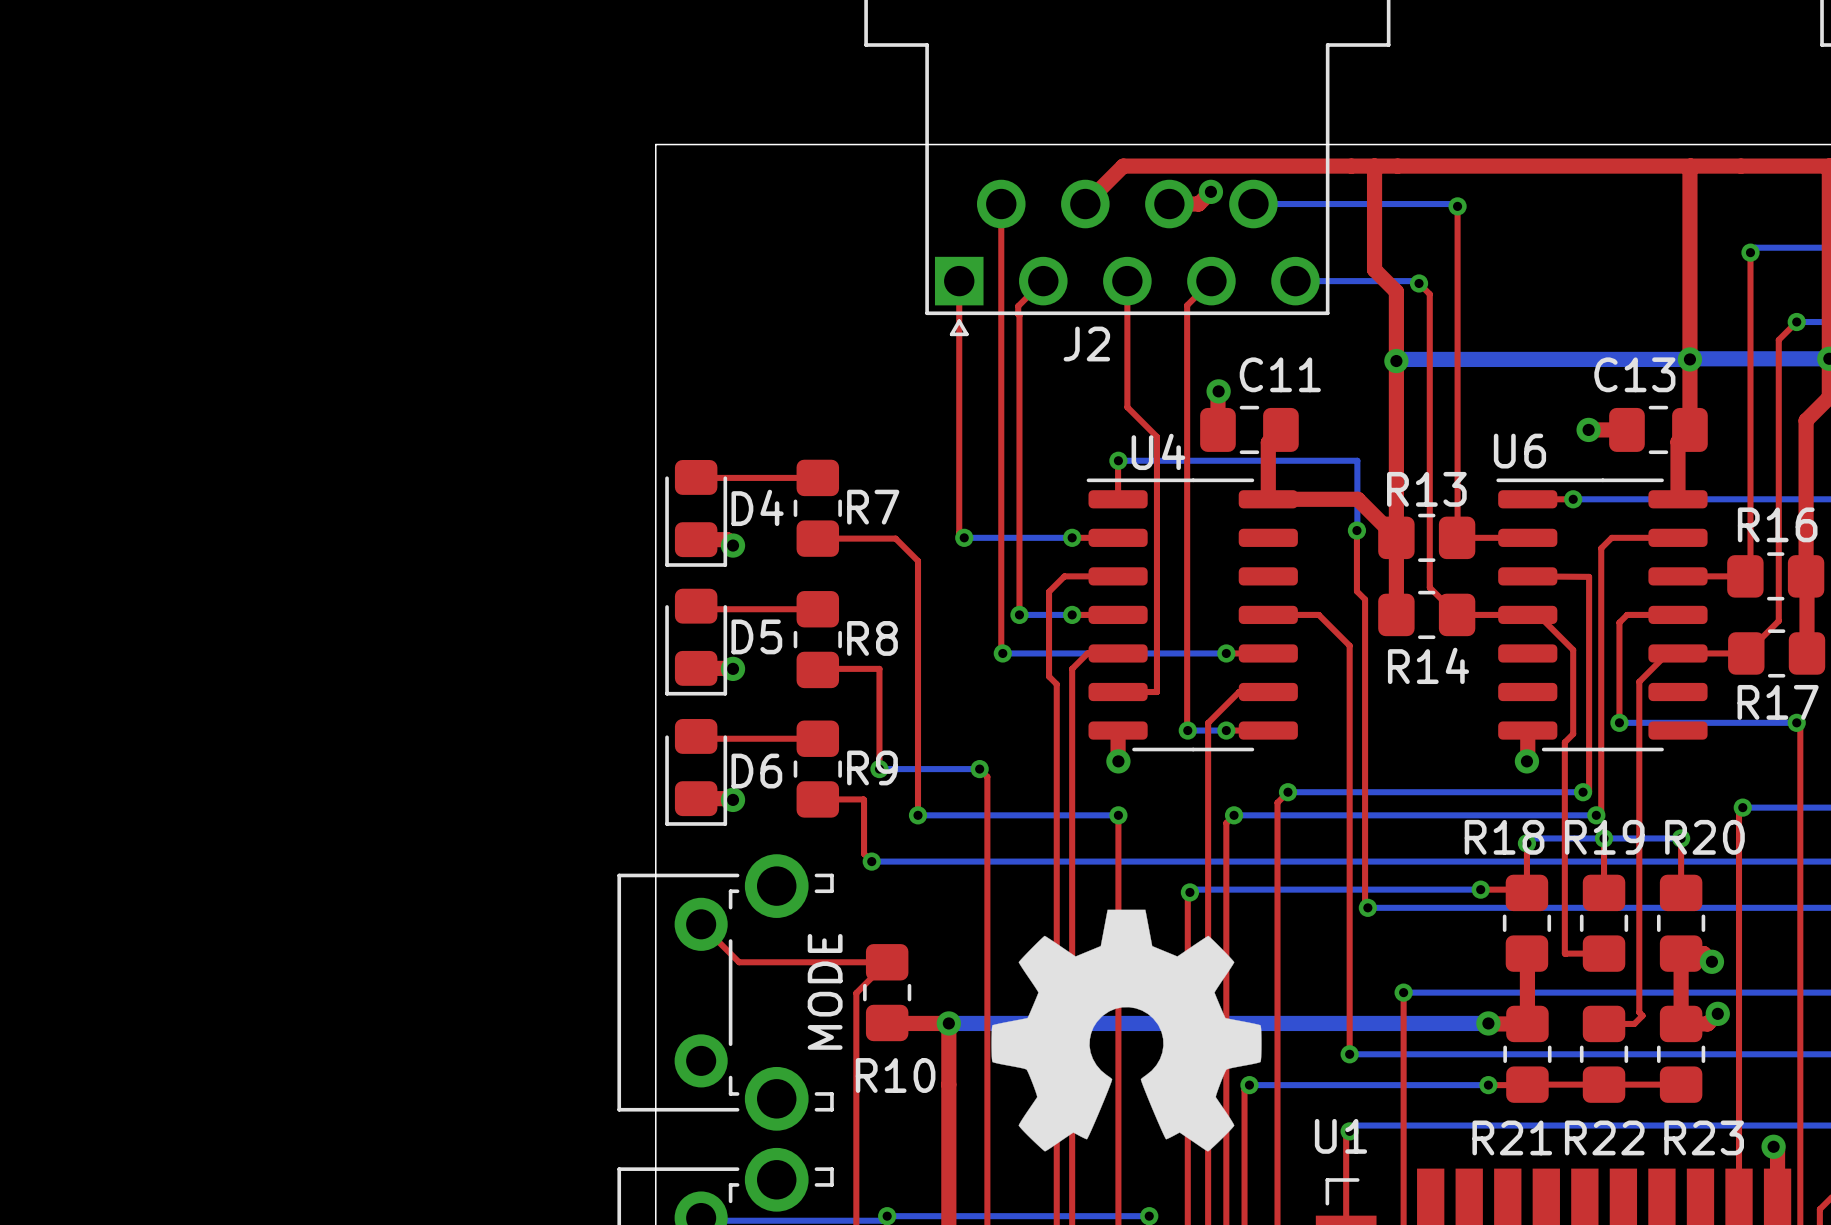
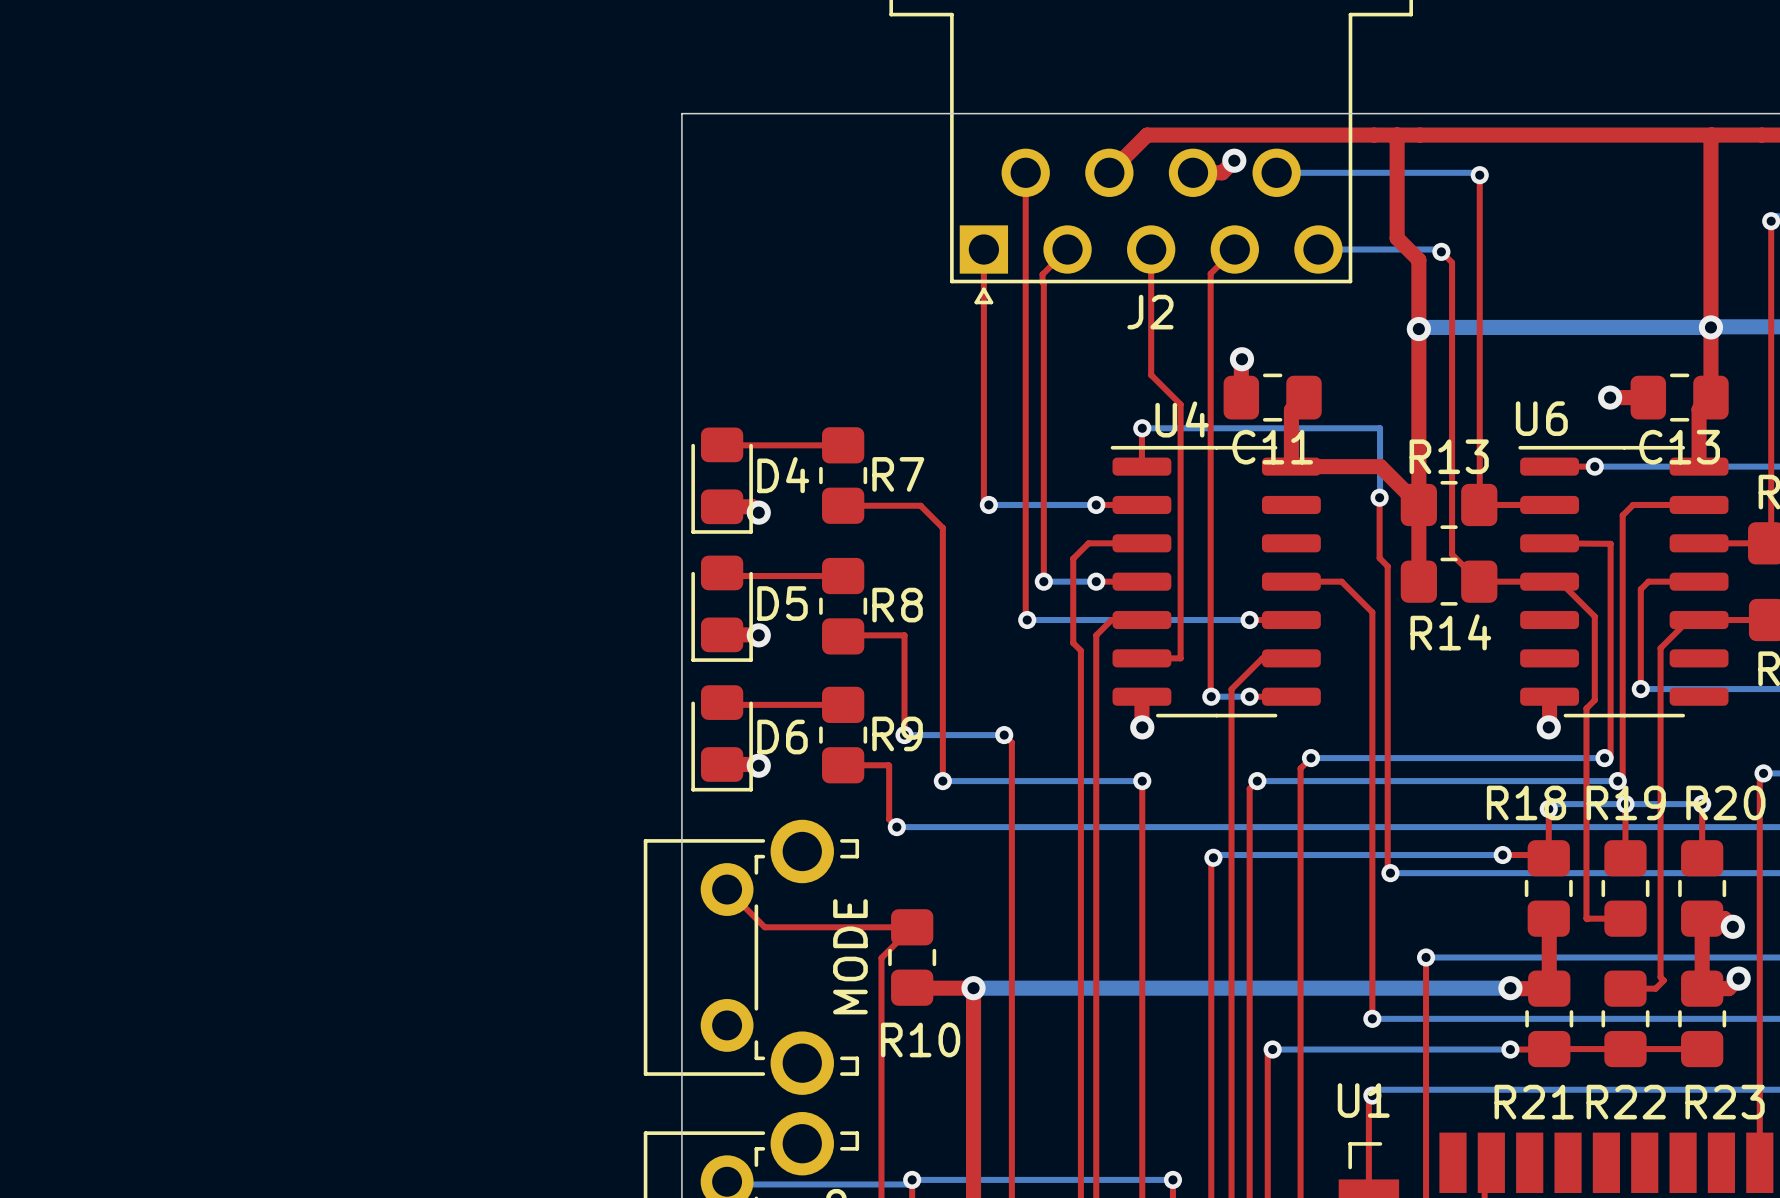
J2 name position: J2 (1086, 344) -> J2 (1150, 312)
C11 name position: C11 (1280, 374) -> C11 (1272, 447)
C13 name position: C13 (1634, 374) -> C13 (1679, 447)
drawing: [991, 909, 1262, 1152] -> none

